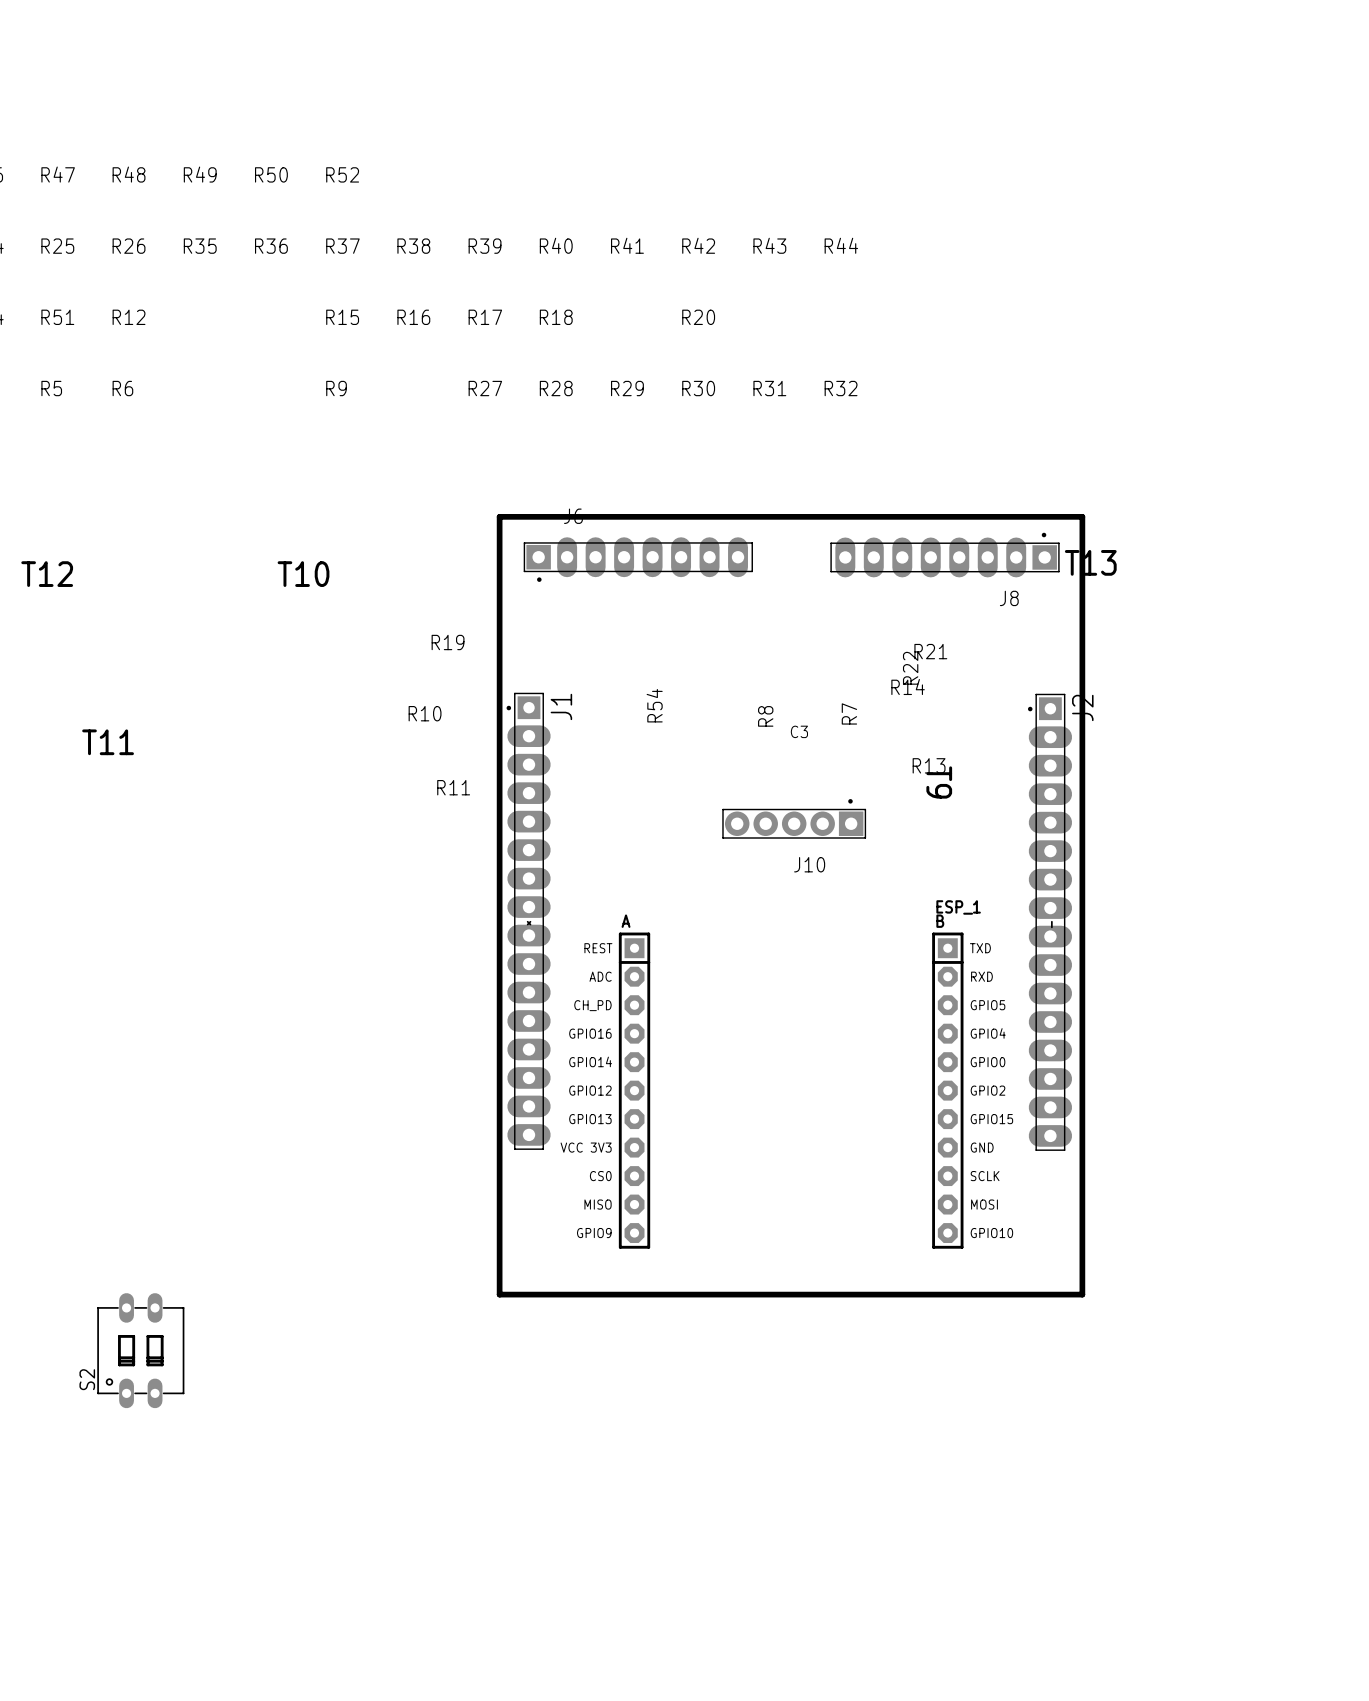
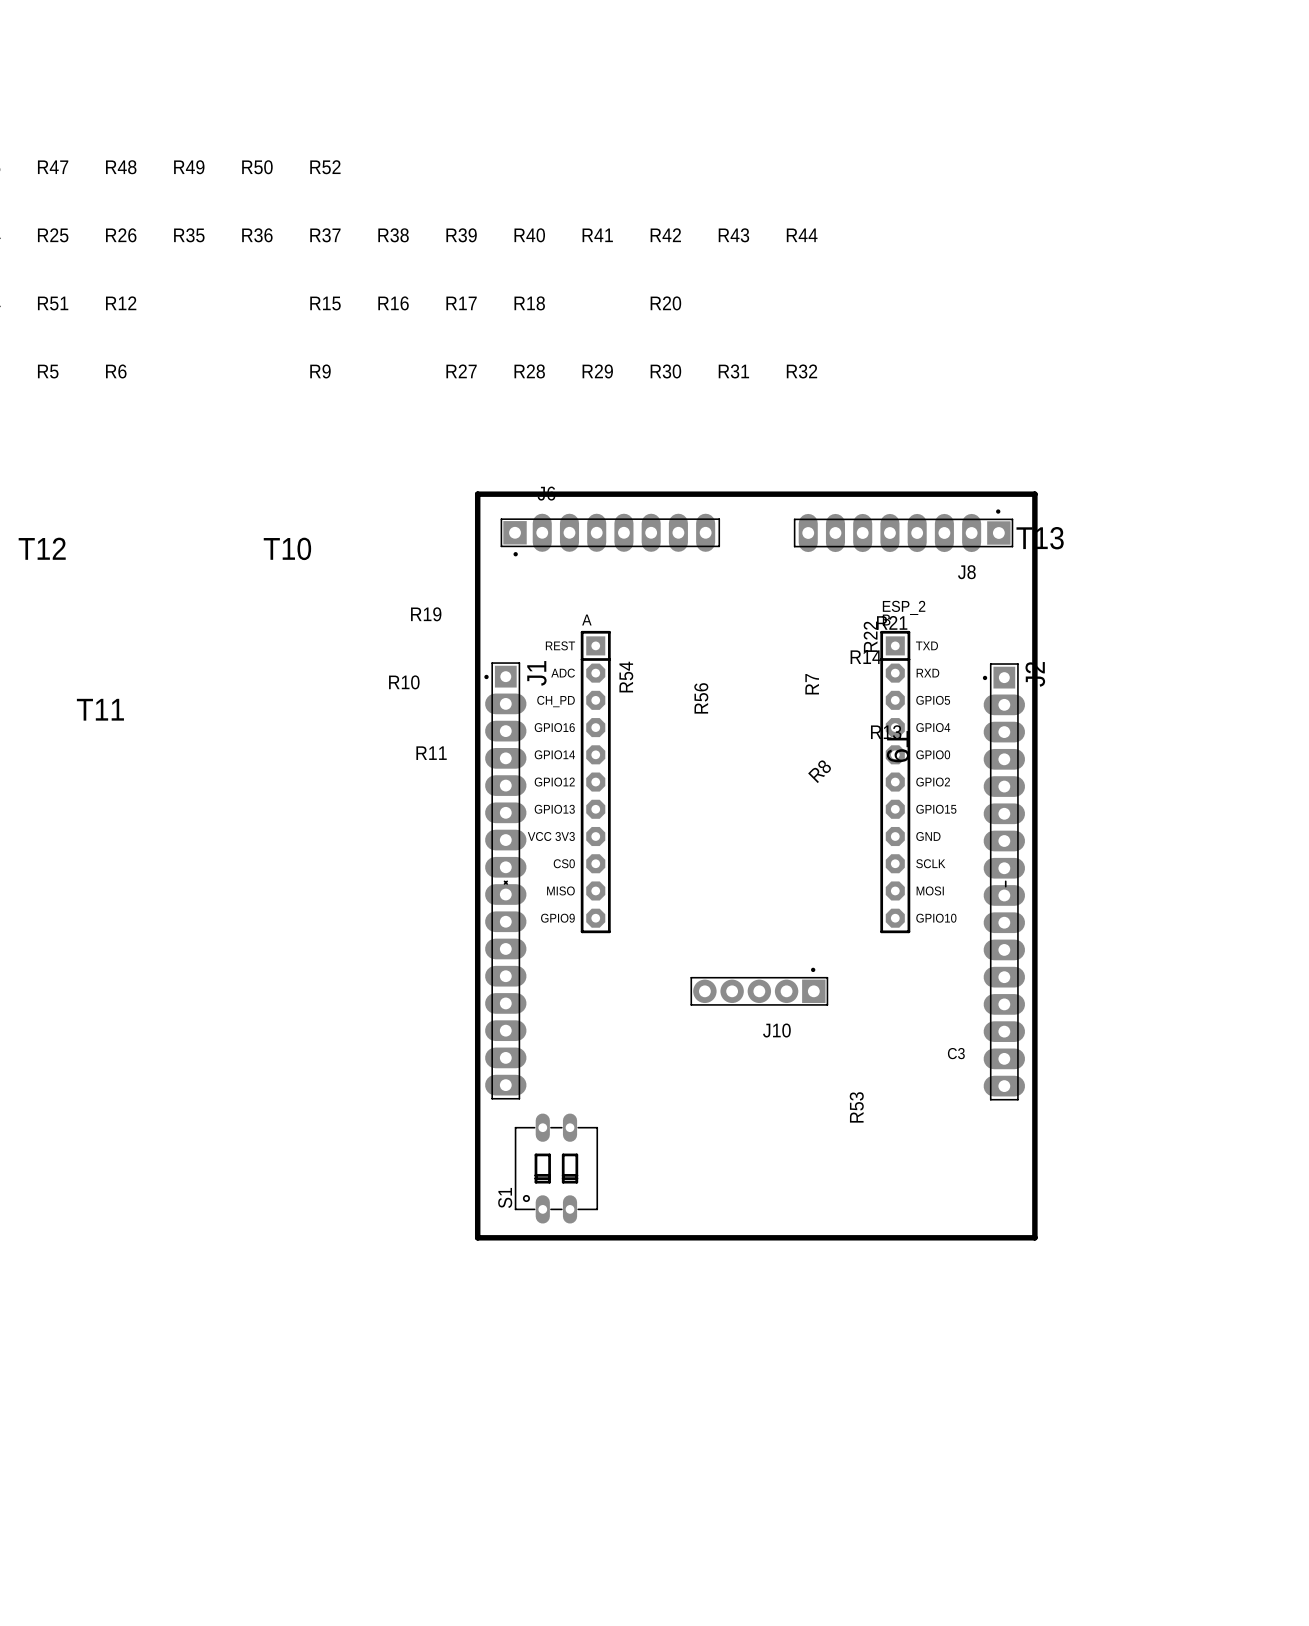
R8 position: (765, 716) -> (819, 771)
R8 name rotation: 0° (765, 716) -> 45° clockwise (819, 771)
C3 position: (799, 731) -> (956, 1053)
R56: none -> (701, 698)
ESP_2: none -> (745, 782)
J10 position: (794, 818) -> (759, 986)
ESP_1: (791, 1090) -> none
R53: none -> (856, 1107)
S1: none -> (556, 1168)
S2: (140, 1350) -> none

